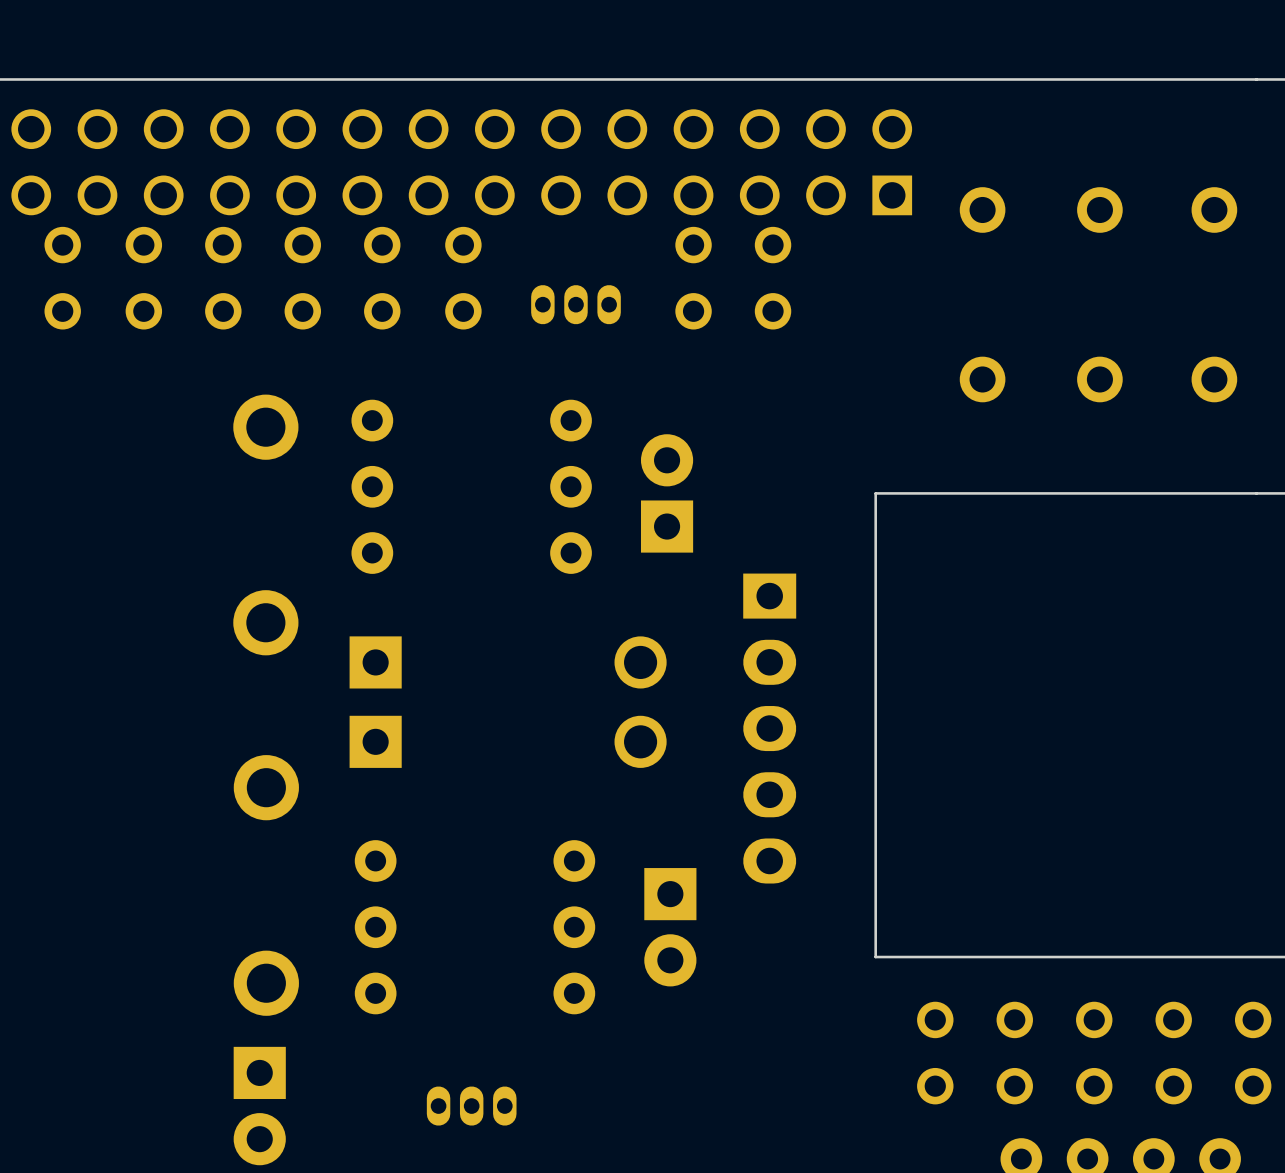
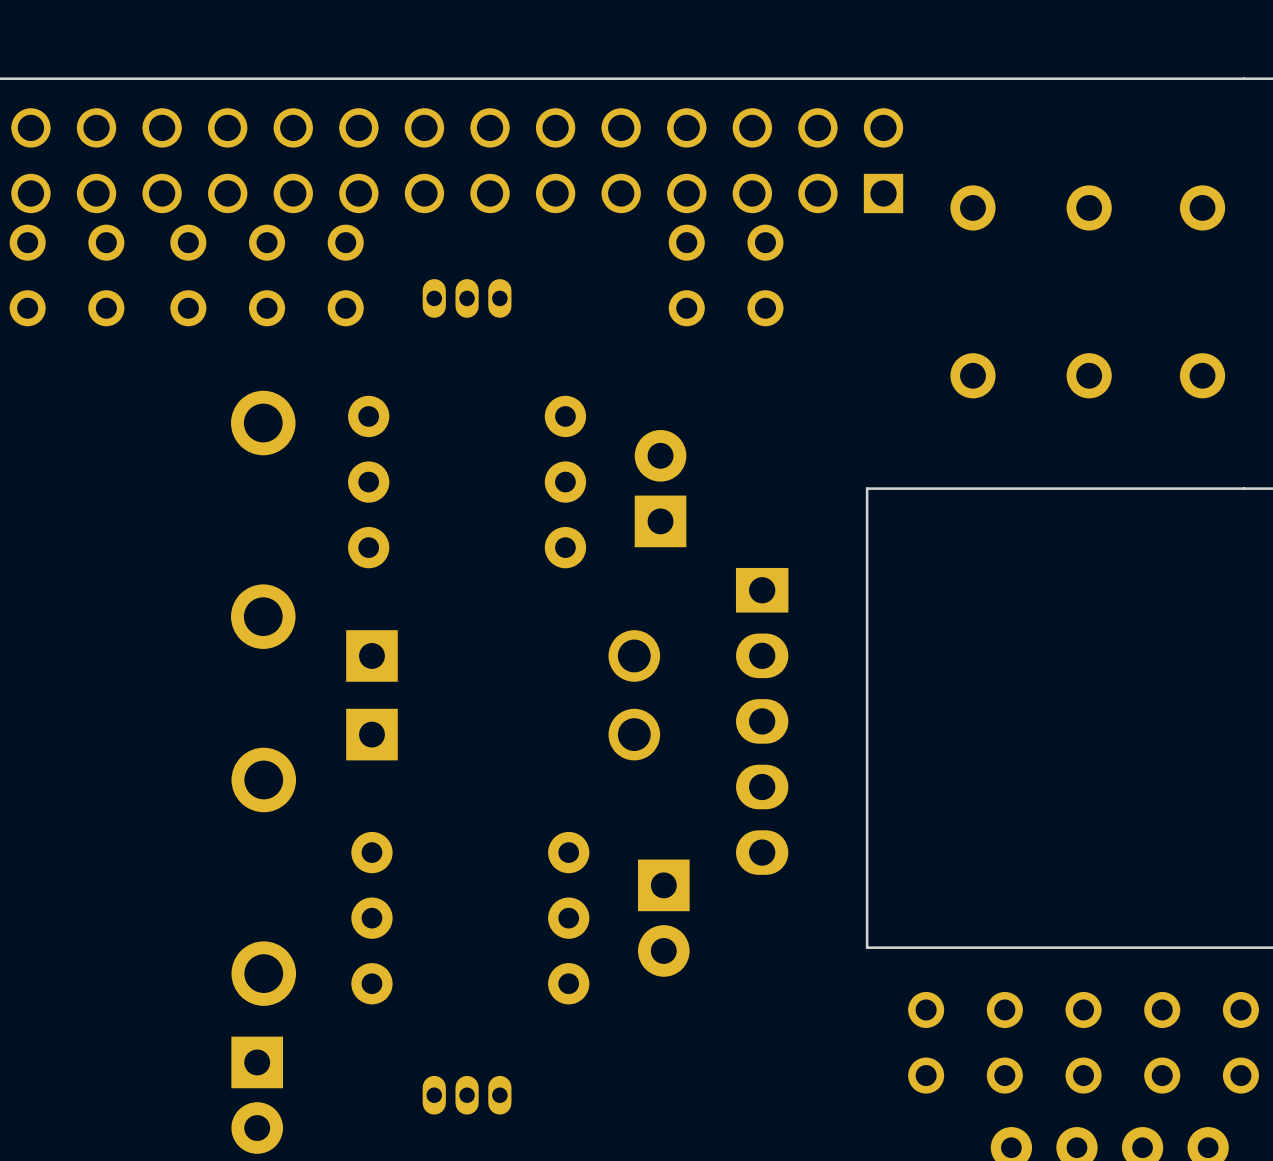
part footprint: [445, 226, 482, 330] -> [422, 279, 512, 318]
part: none -> (27, 275)
part: (62, 278) -> none
part: none -> (106, 275)
part: (143, 278) -> none
part: none -> (188, 275)
part: (223, 278) -> none
part: none -> (267, 275)
part: (302, 278) -> none
part: none -> (345, 275)
part: (382, 278) -> none
part: (575, 304) -> none

